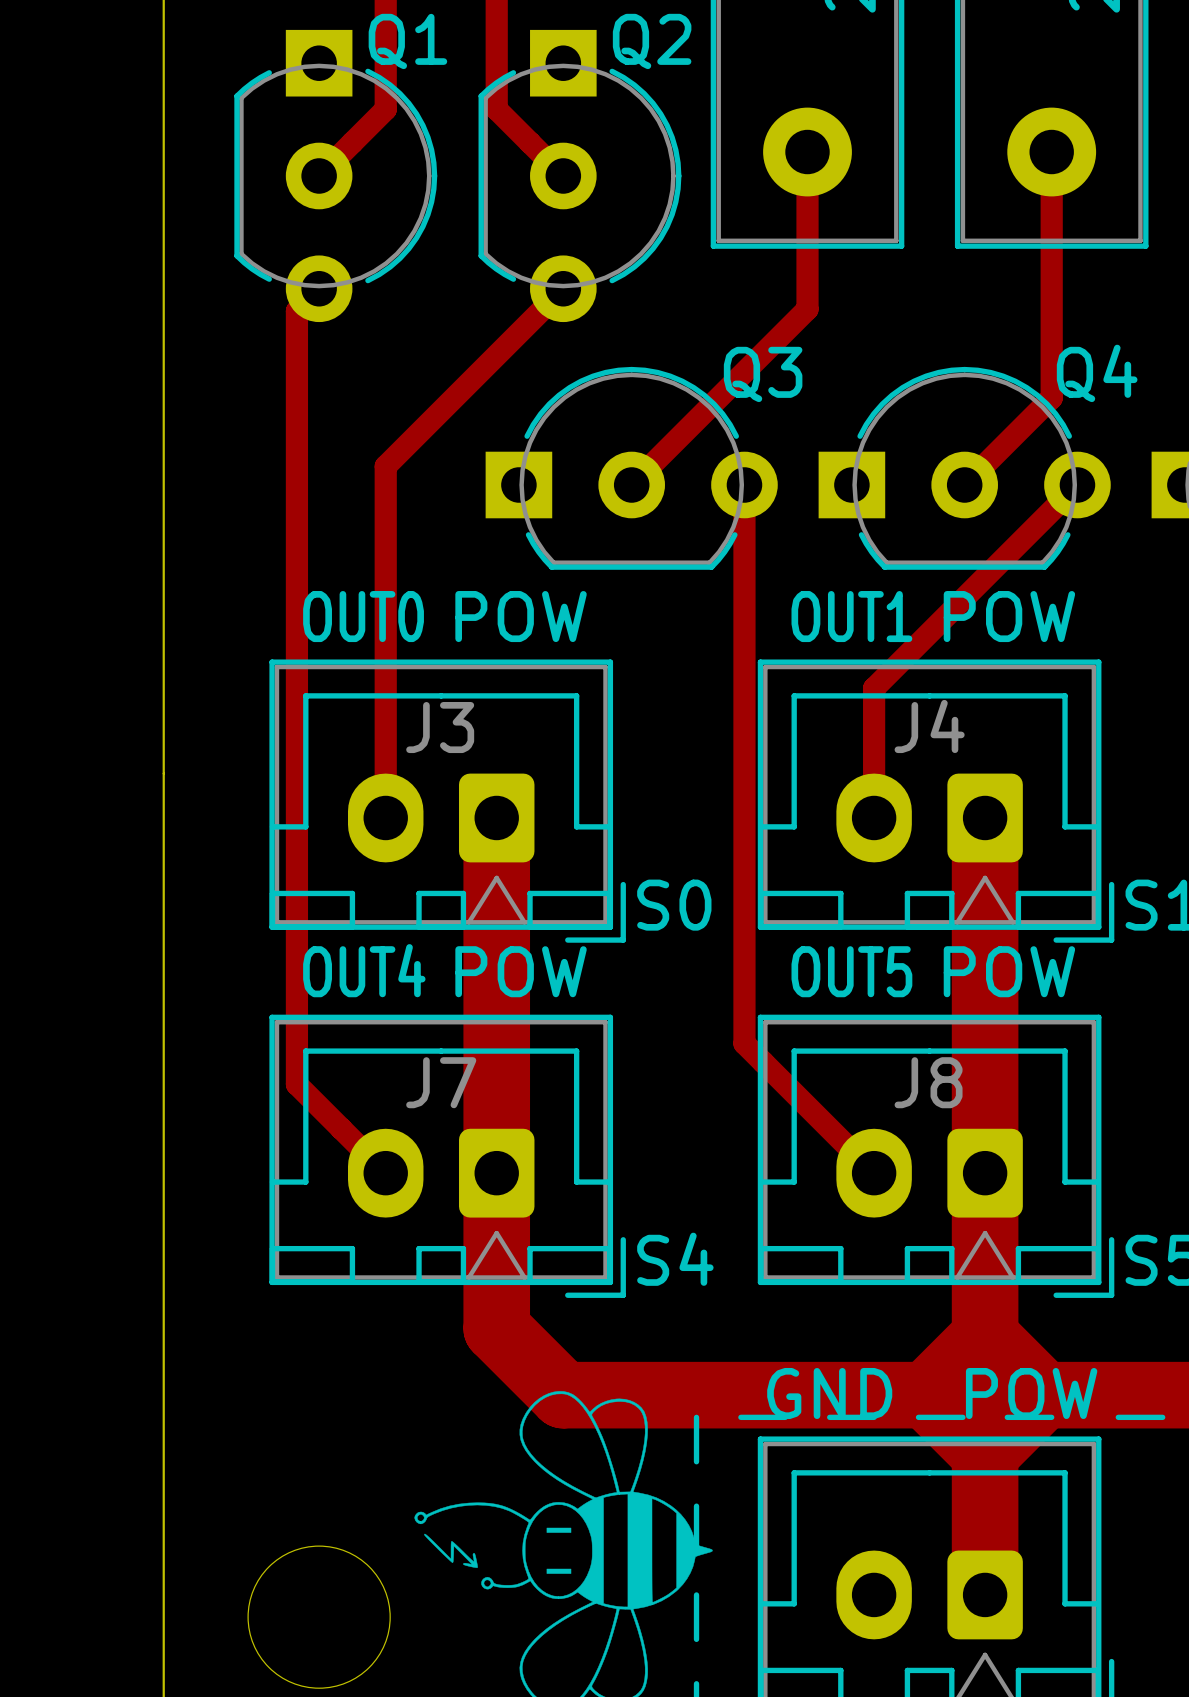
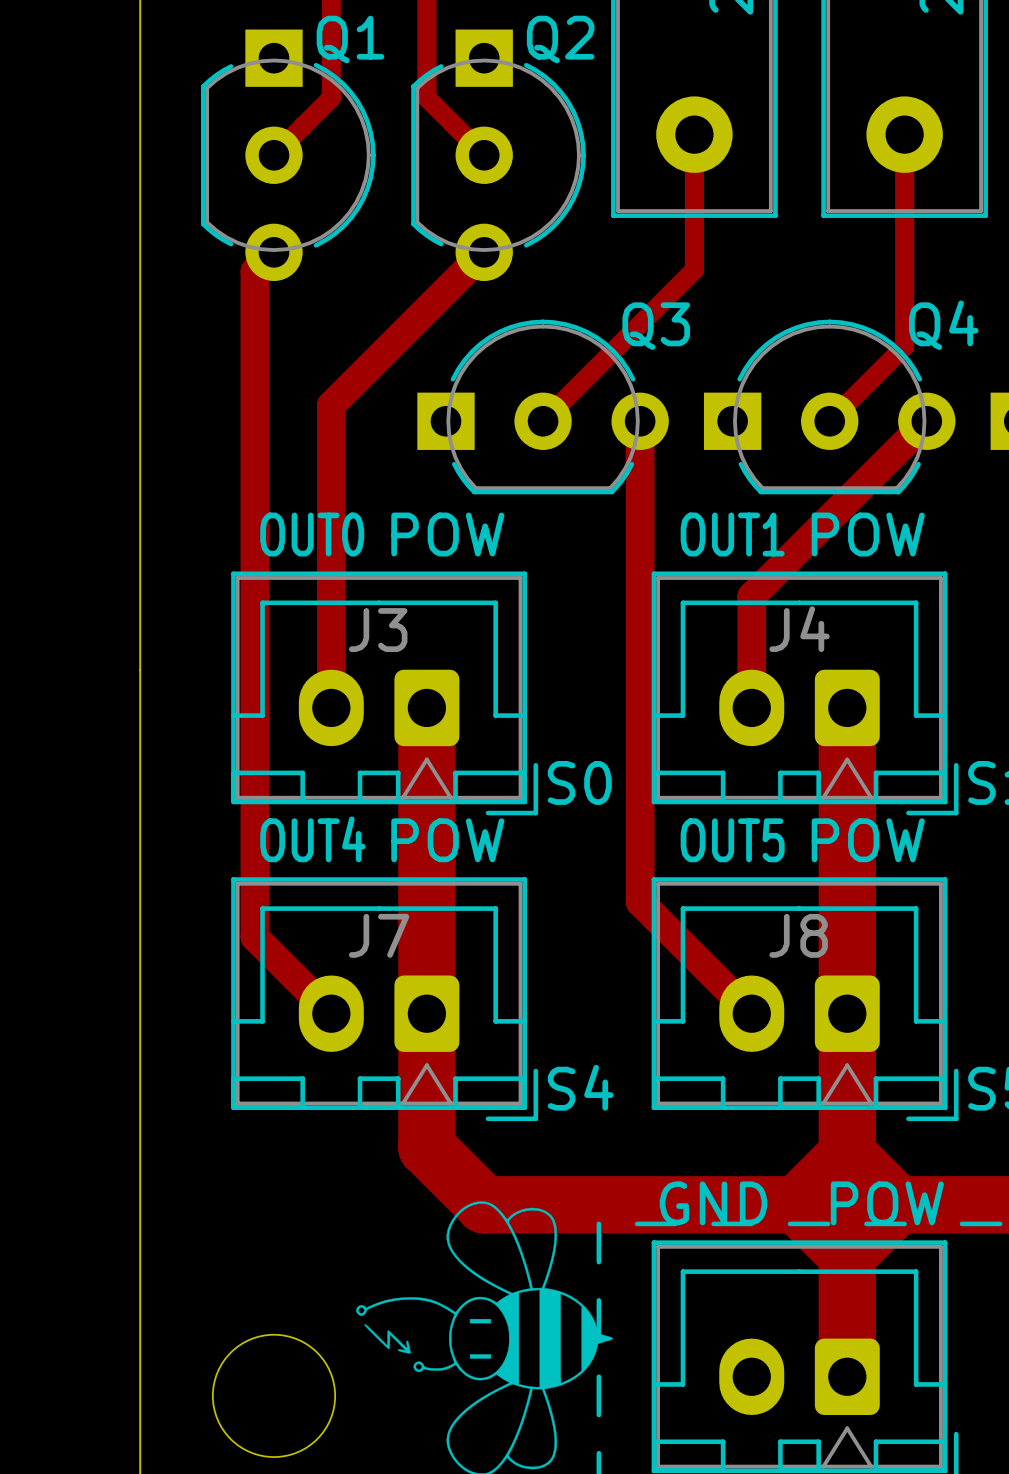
track width: thin (319, 288) (296, 310) (296, 1084) (385, 1173) -> thick (274, 252) (254, 271) (254, 937) (331, 1013)
track width: thin (563, 288) (385, 466) (385, 817) -> thick (484, 252) (331, 405) (331, 707)
track width: thin (744, 485) (744, 1043) (874, 1173) -> thick (640, 421) (640, 902) (751, 1013)
track width: thin (1077, 485) (874, 688) (874, 817) -> thick (926, 421) (751, 596) (751, 707)

